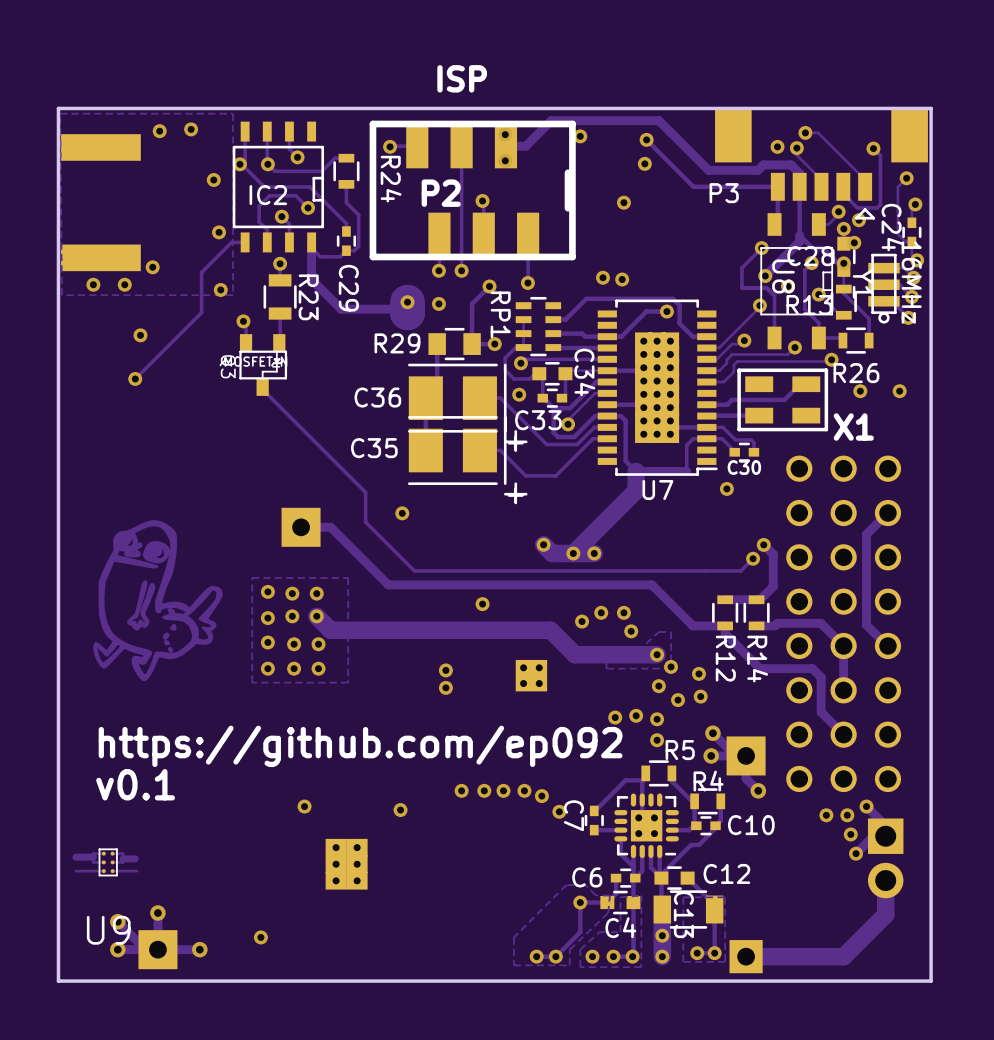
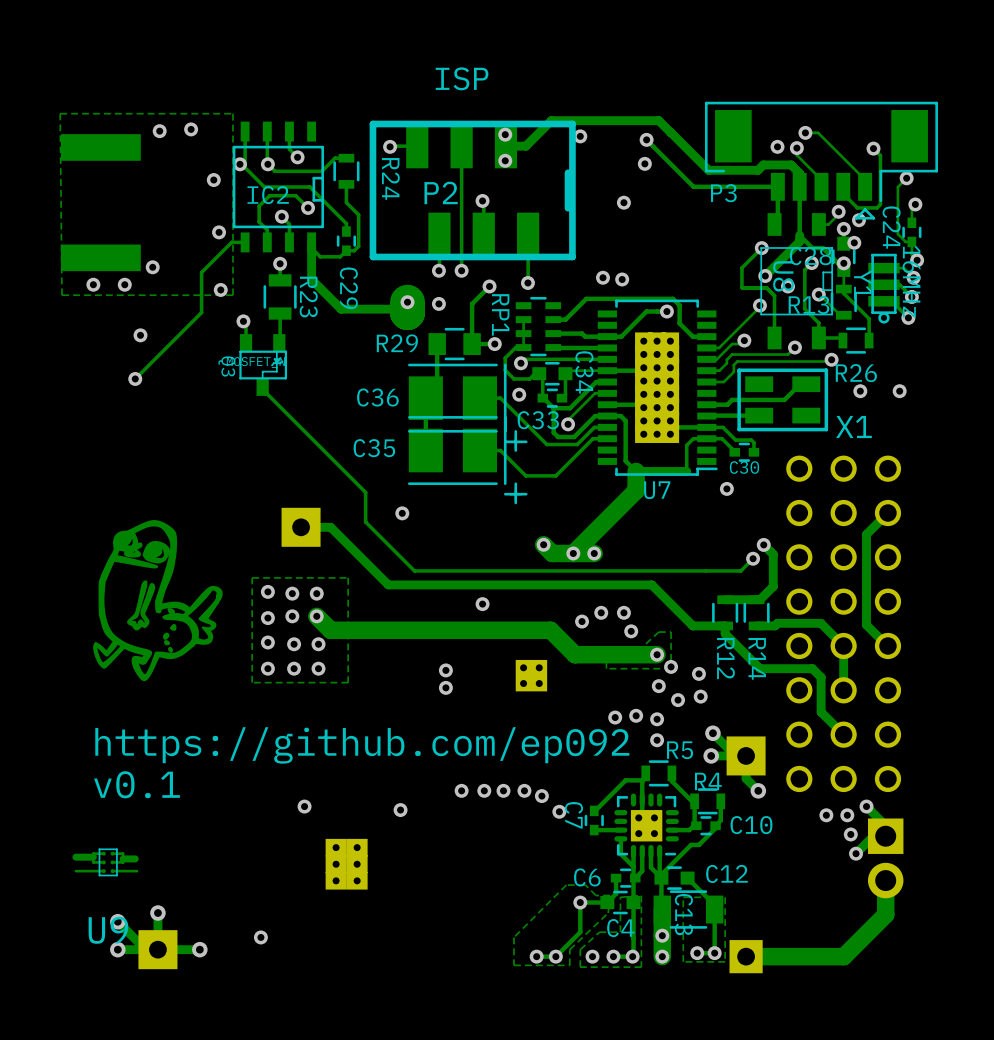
board edge: (931, 108) (58, 108) (58, 981) (931, 981) (931, 108) -> none
P3 footprint: [715, 110, 928, 220] -> [704, 101, 938, 220]

